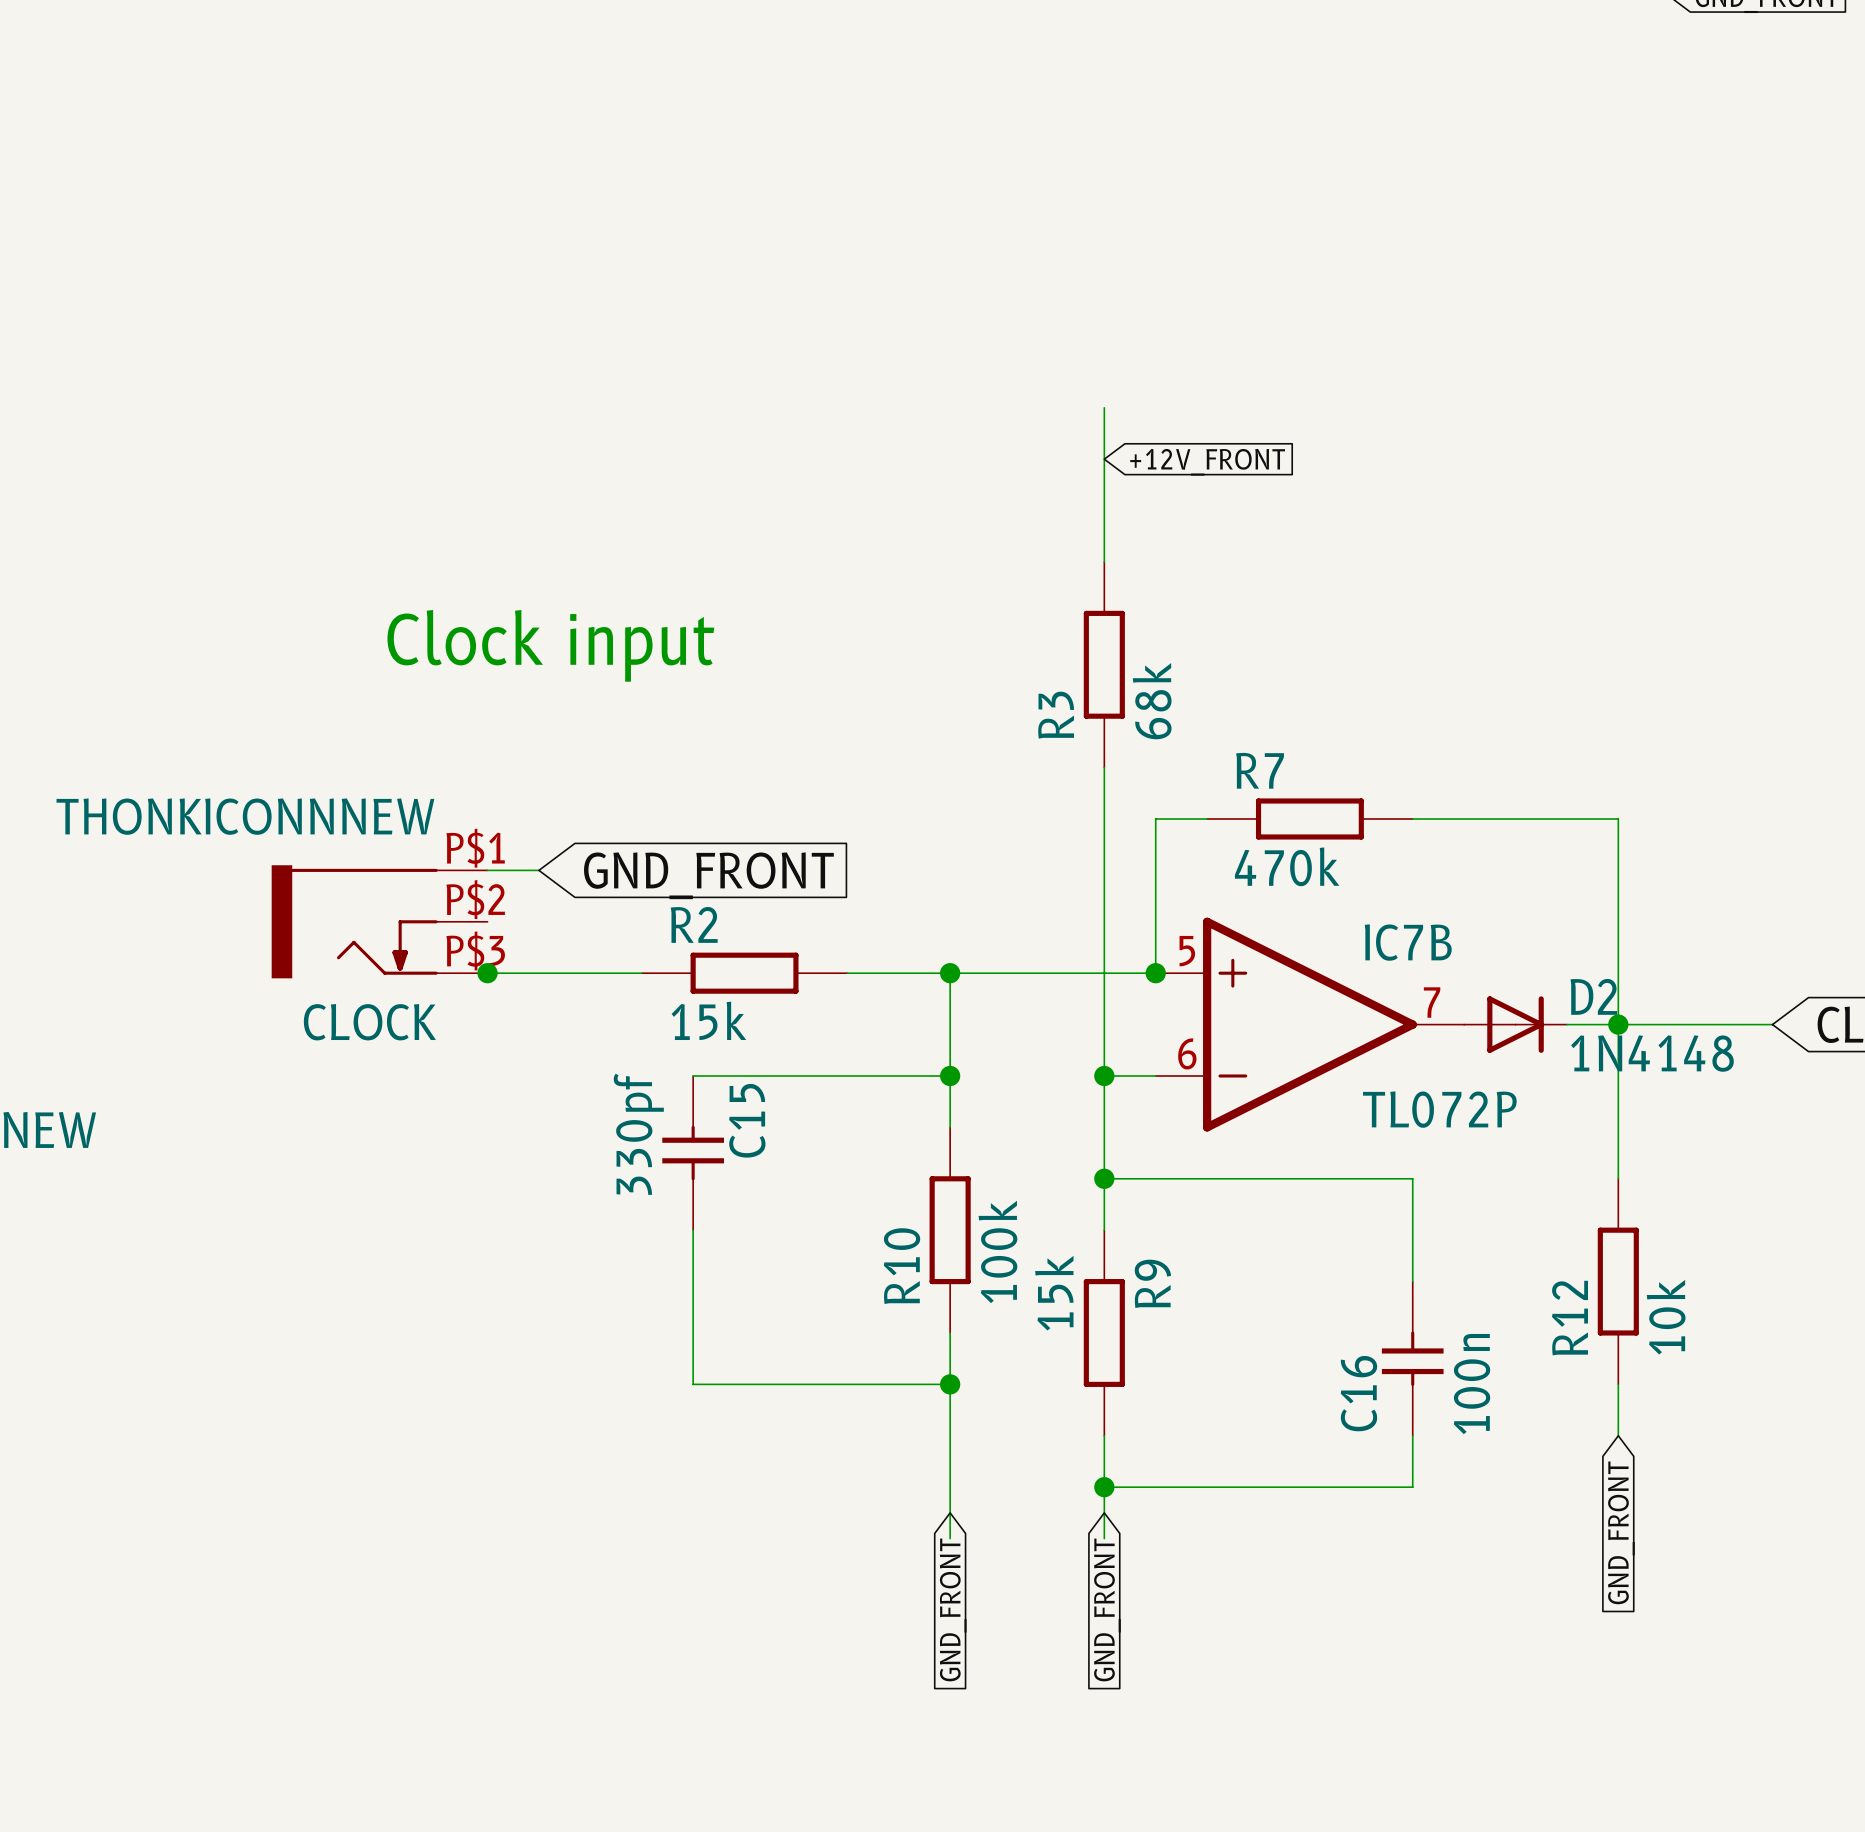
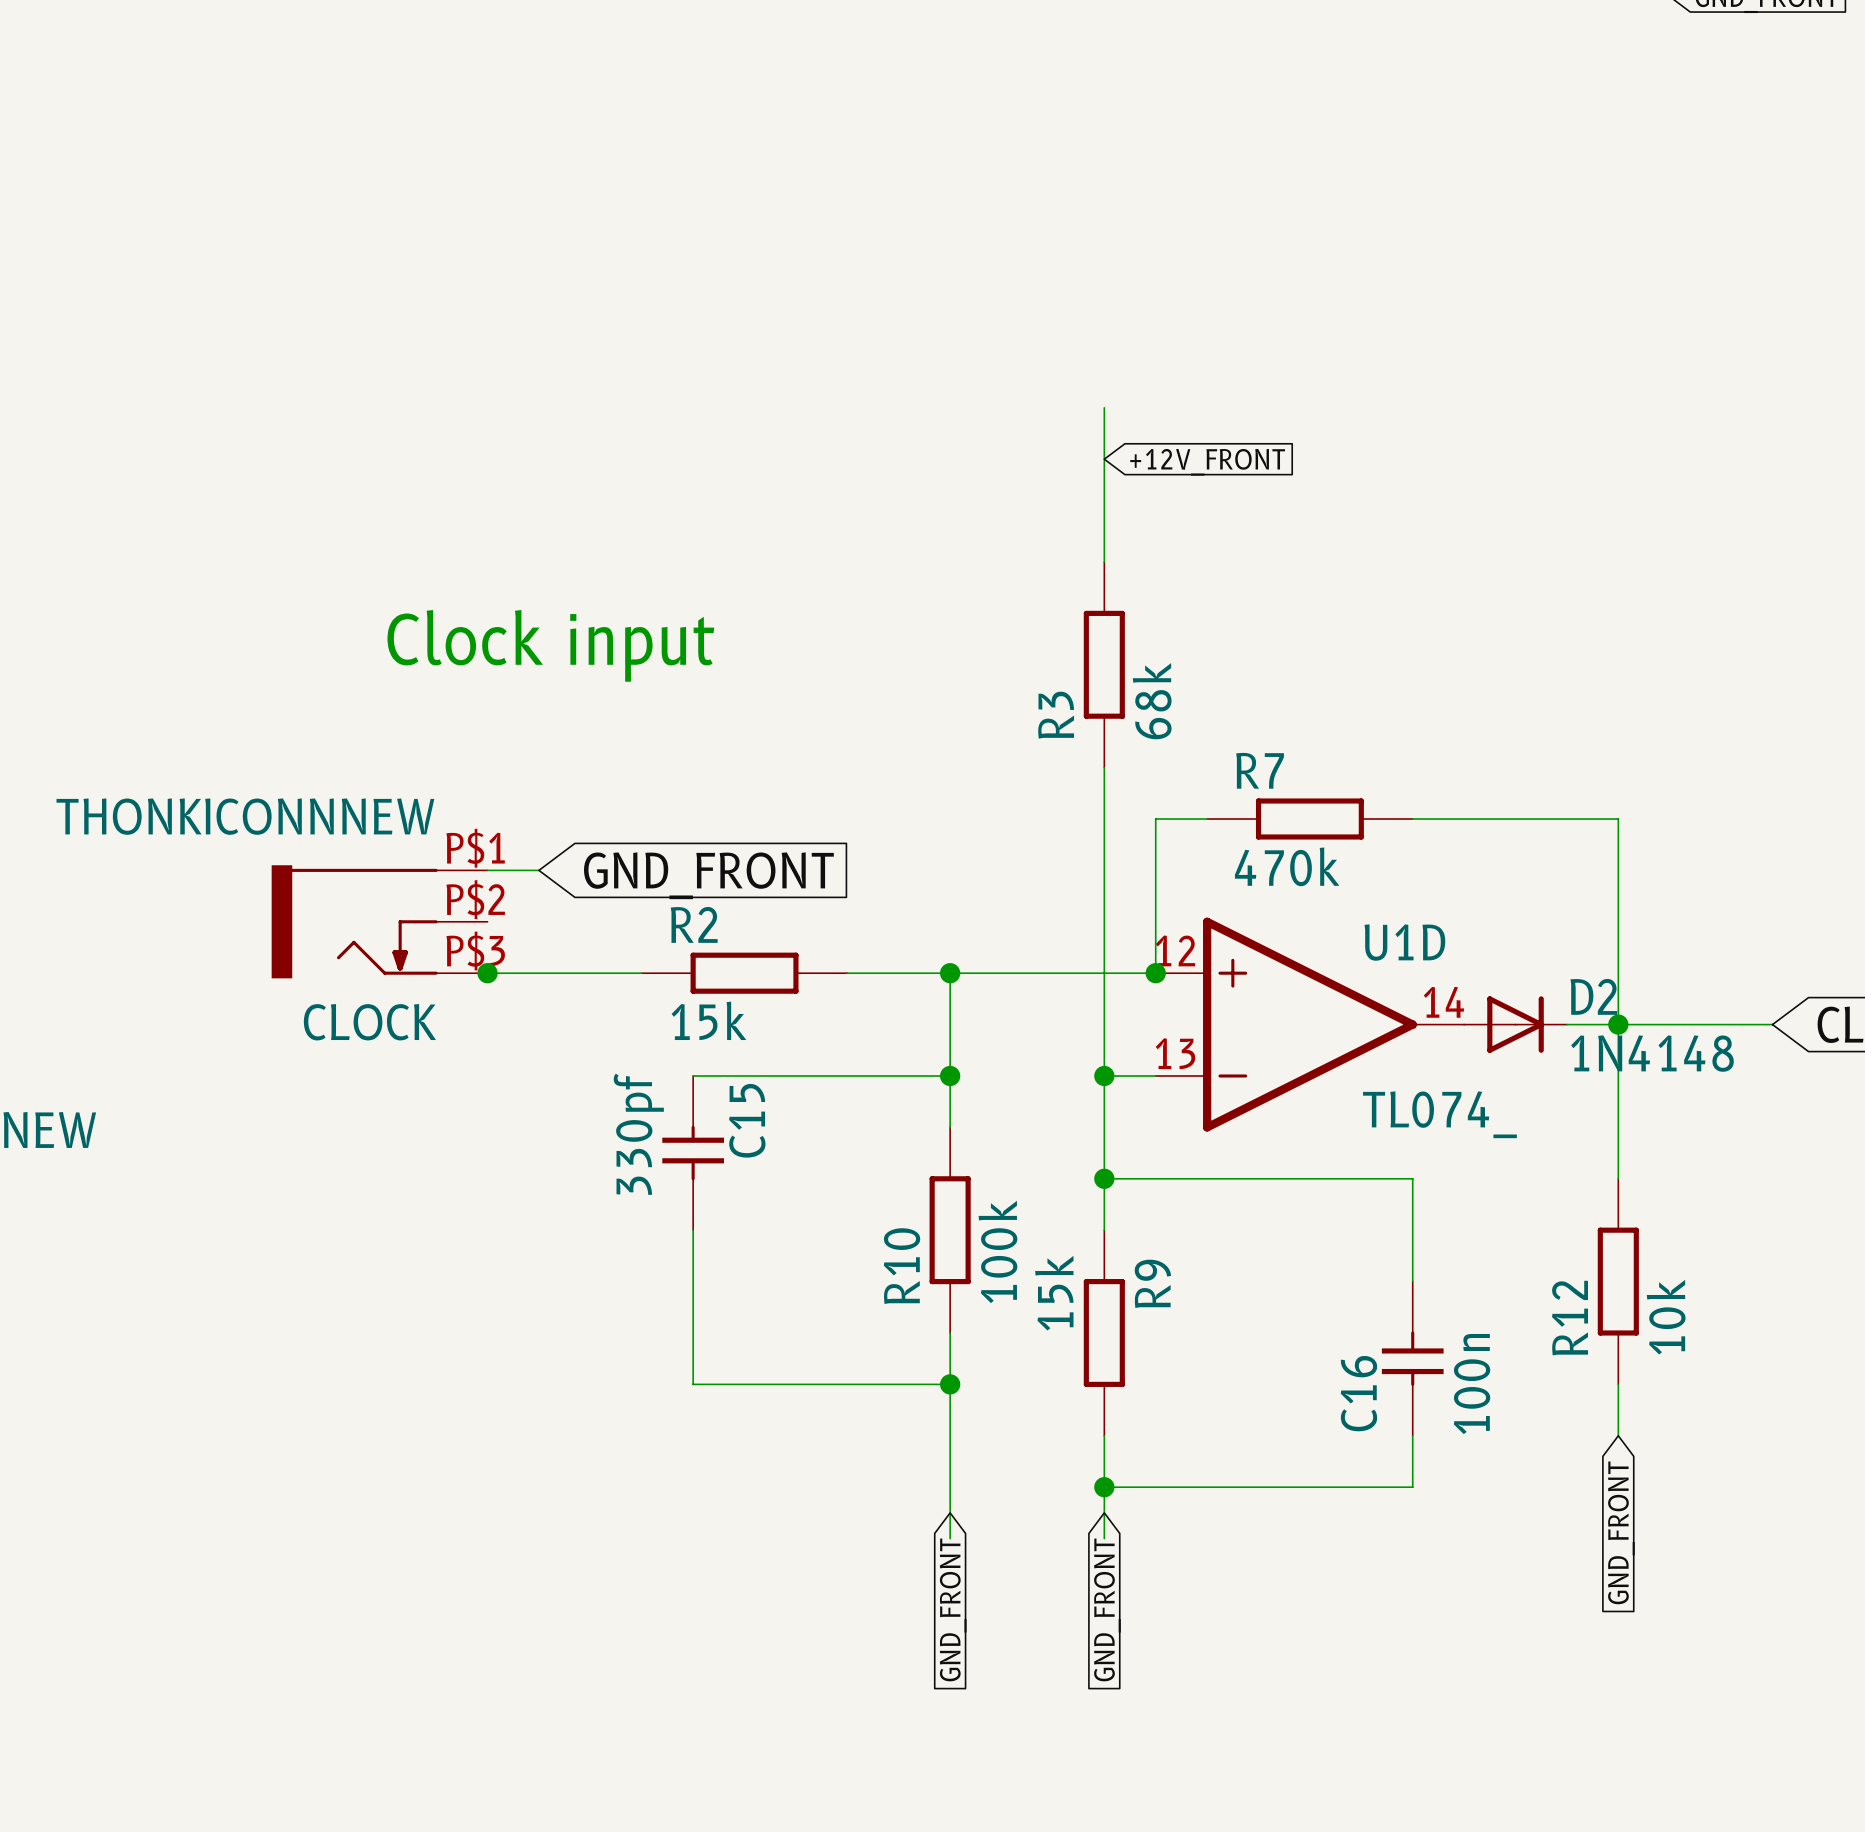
IC7B name: IC7B (1408, 942) -> U1D (1404, 942)
IC7B pin number: 5 (1187, 951) -> 12 (1175, 950)
IC7B pin number: 7 (1432, 1002) -> 14 (1443, 1002)
IC7B pin number: 6 (1187, 1053) -> 13 (1175, 1053)
IC7B value: TL072P (1439, 1109) -> TL074_ (1439, 1114)

